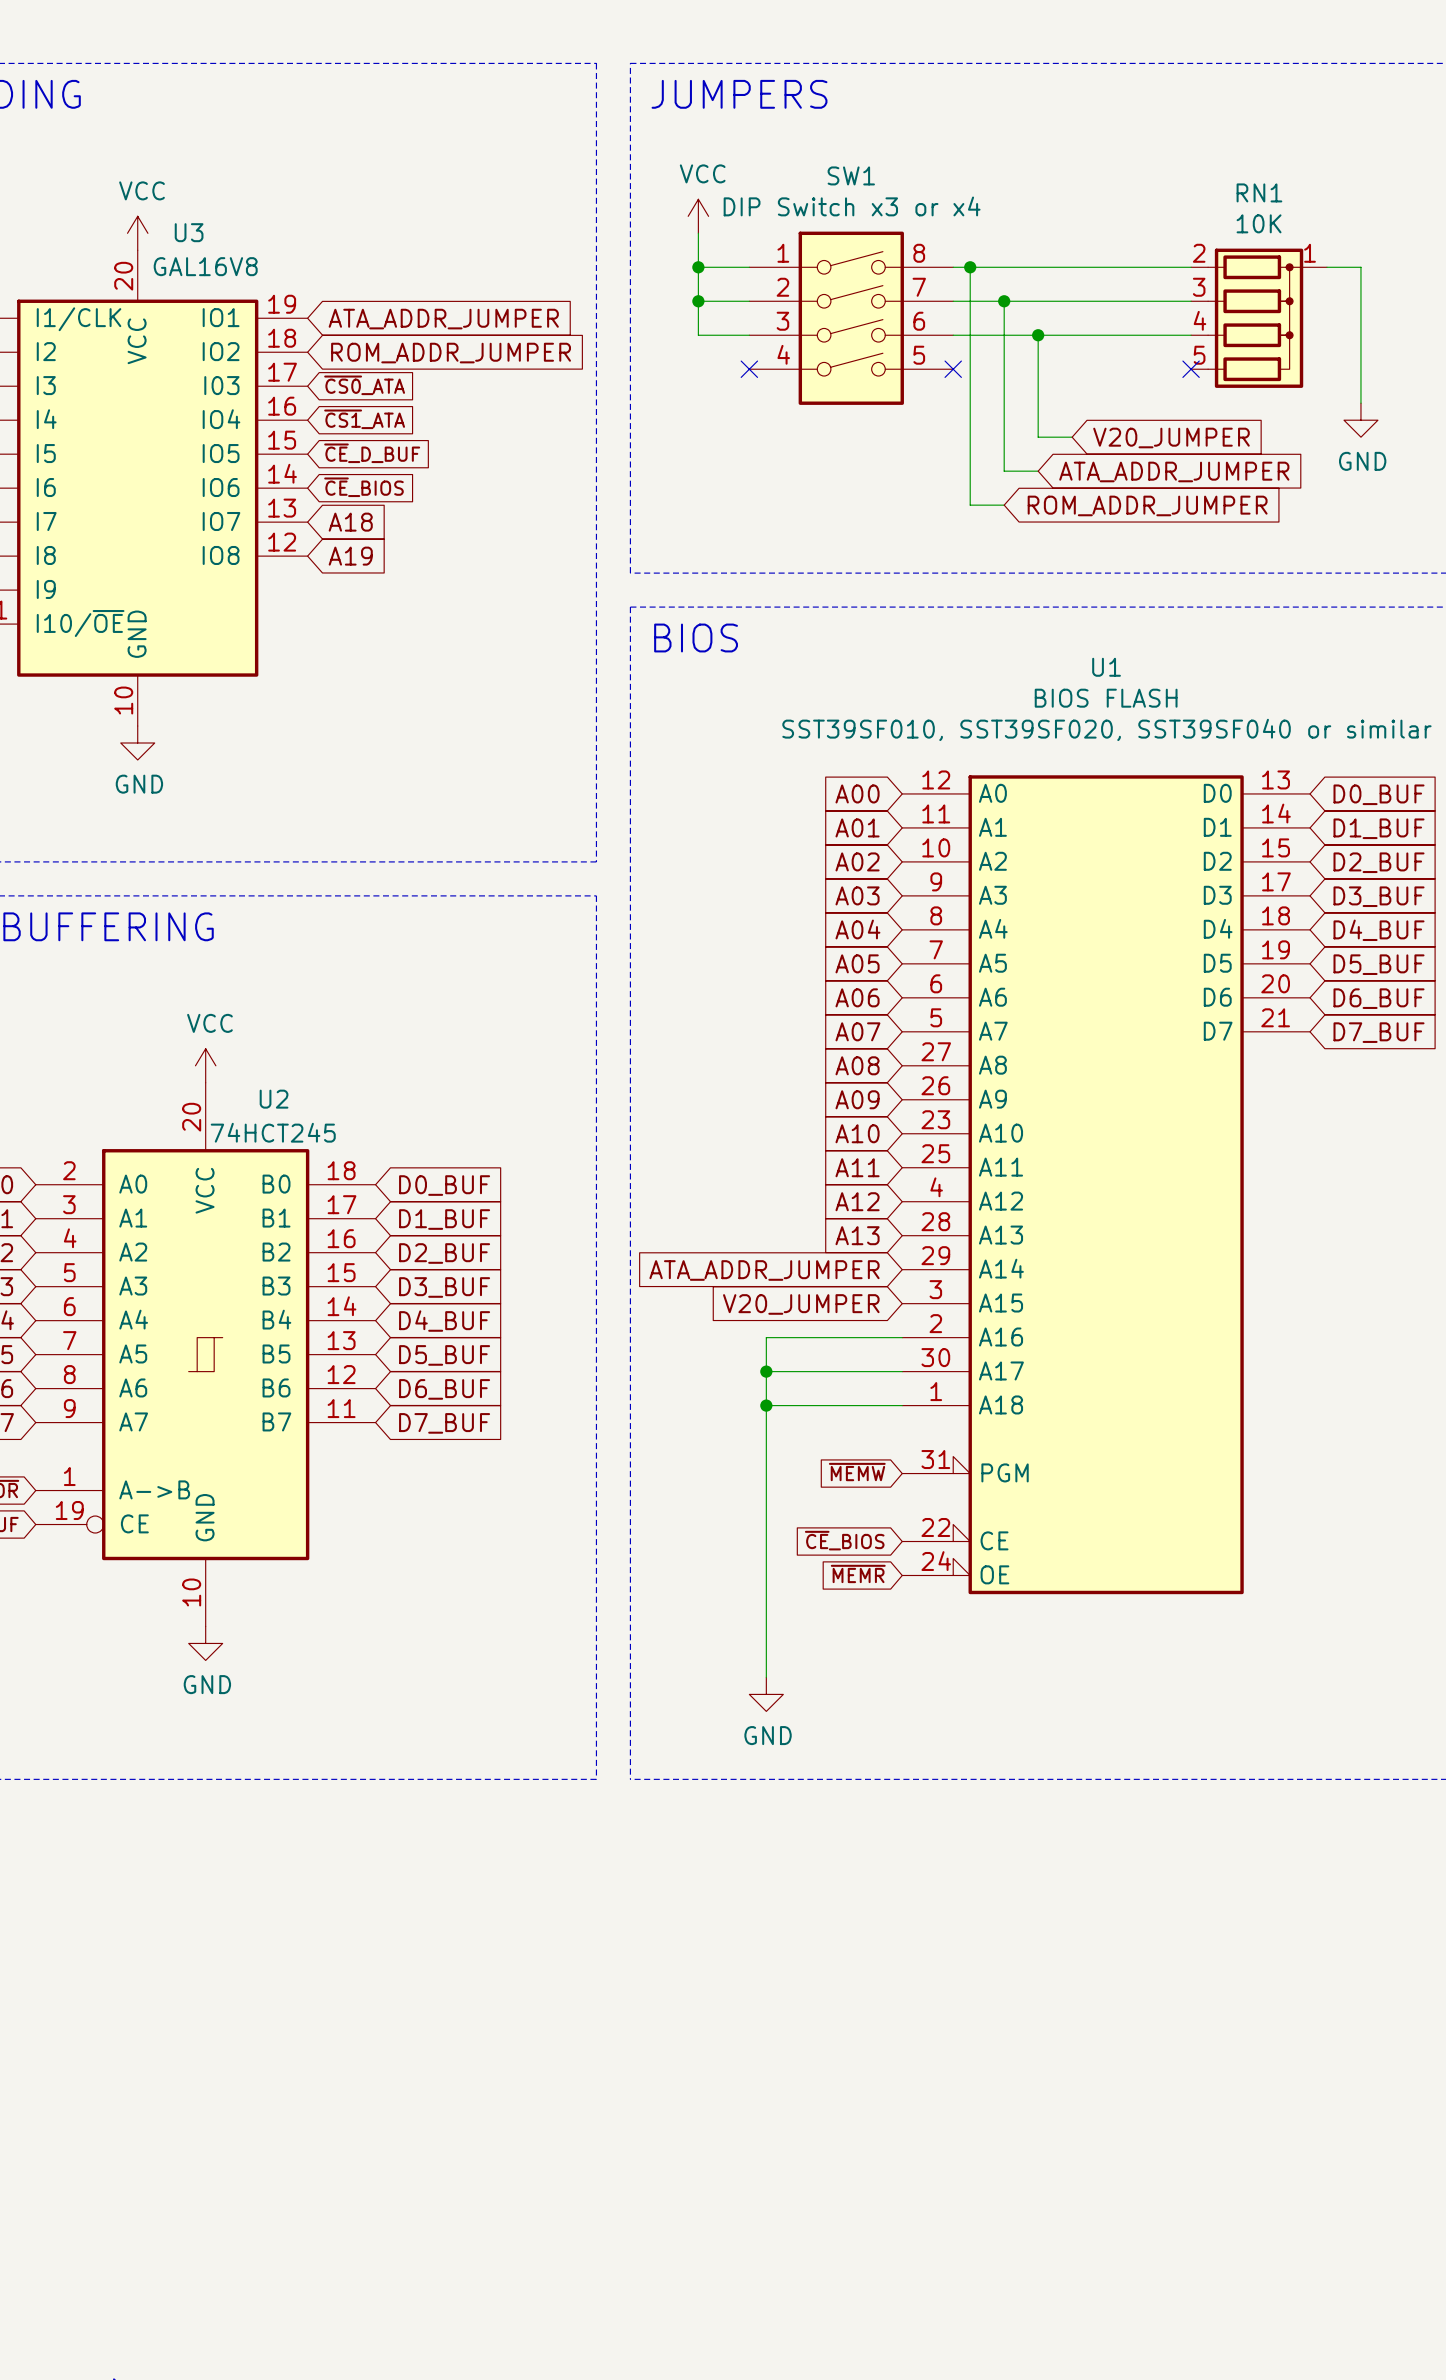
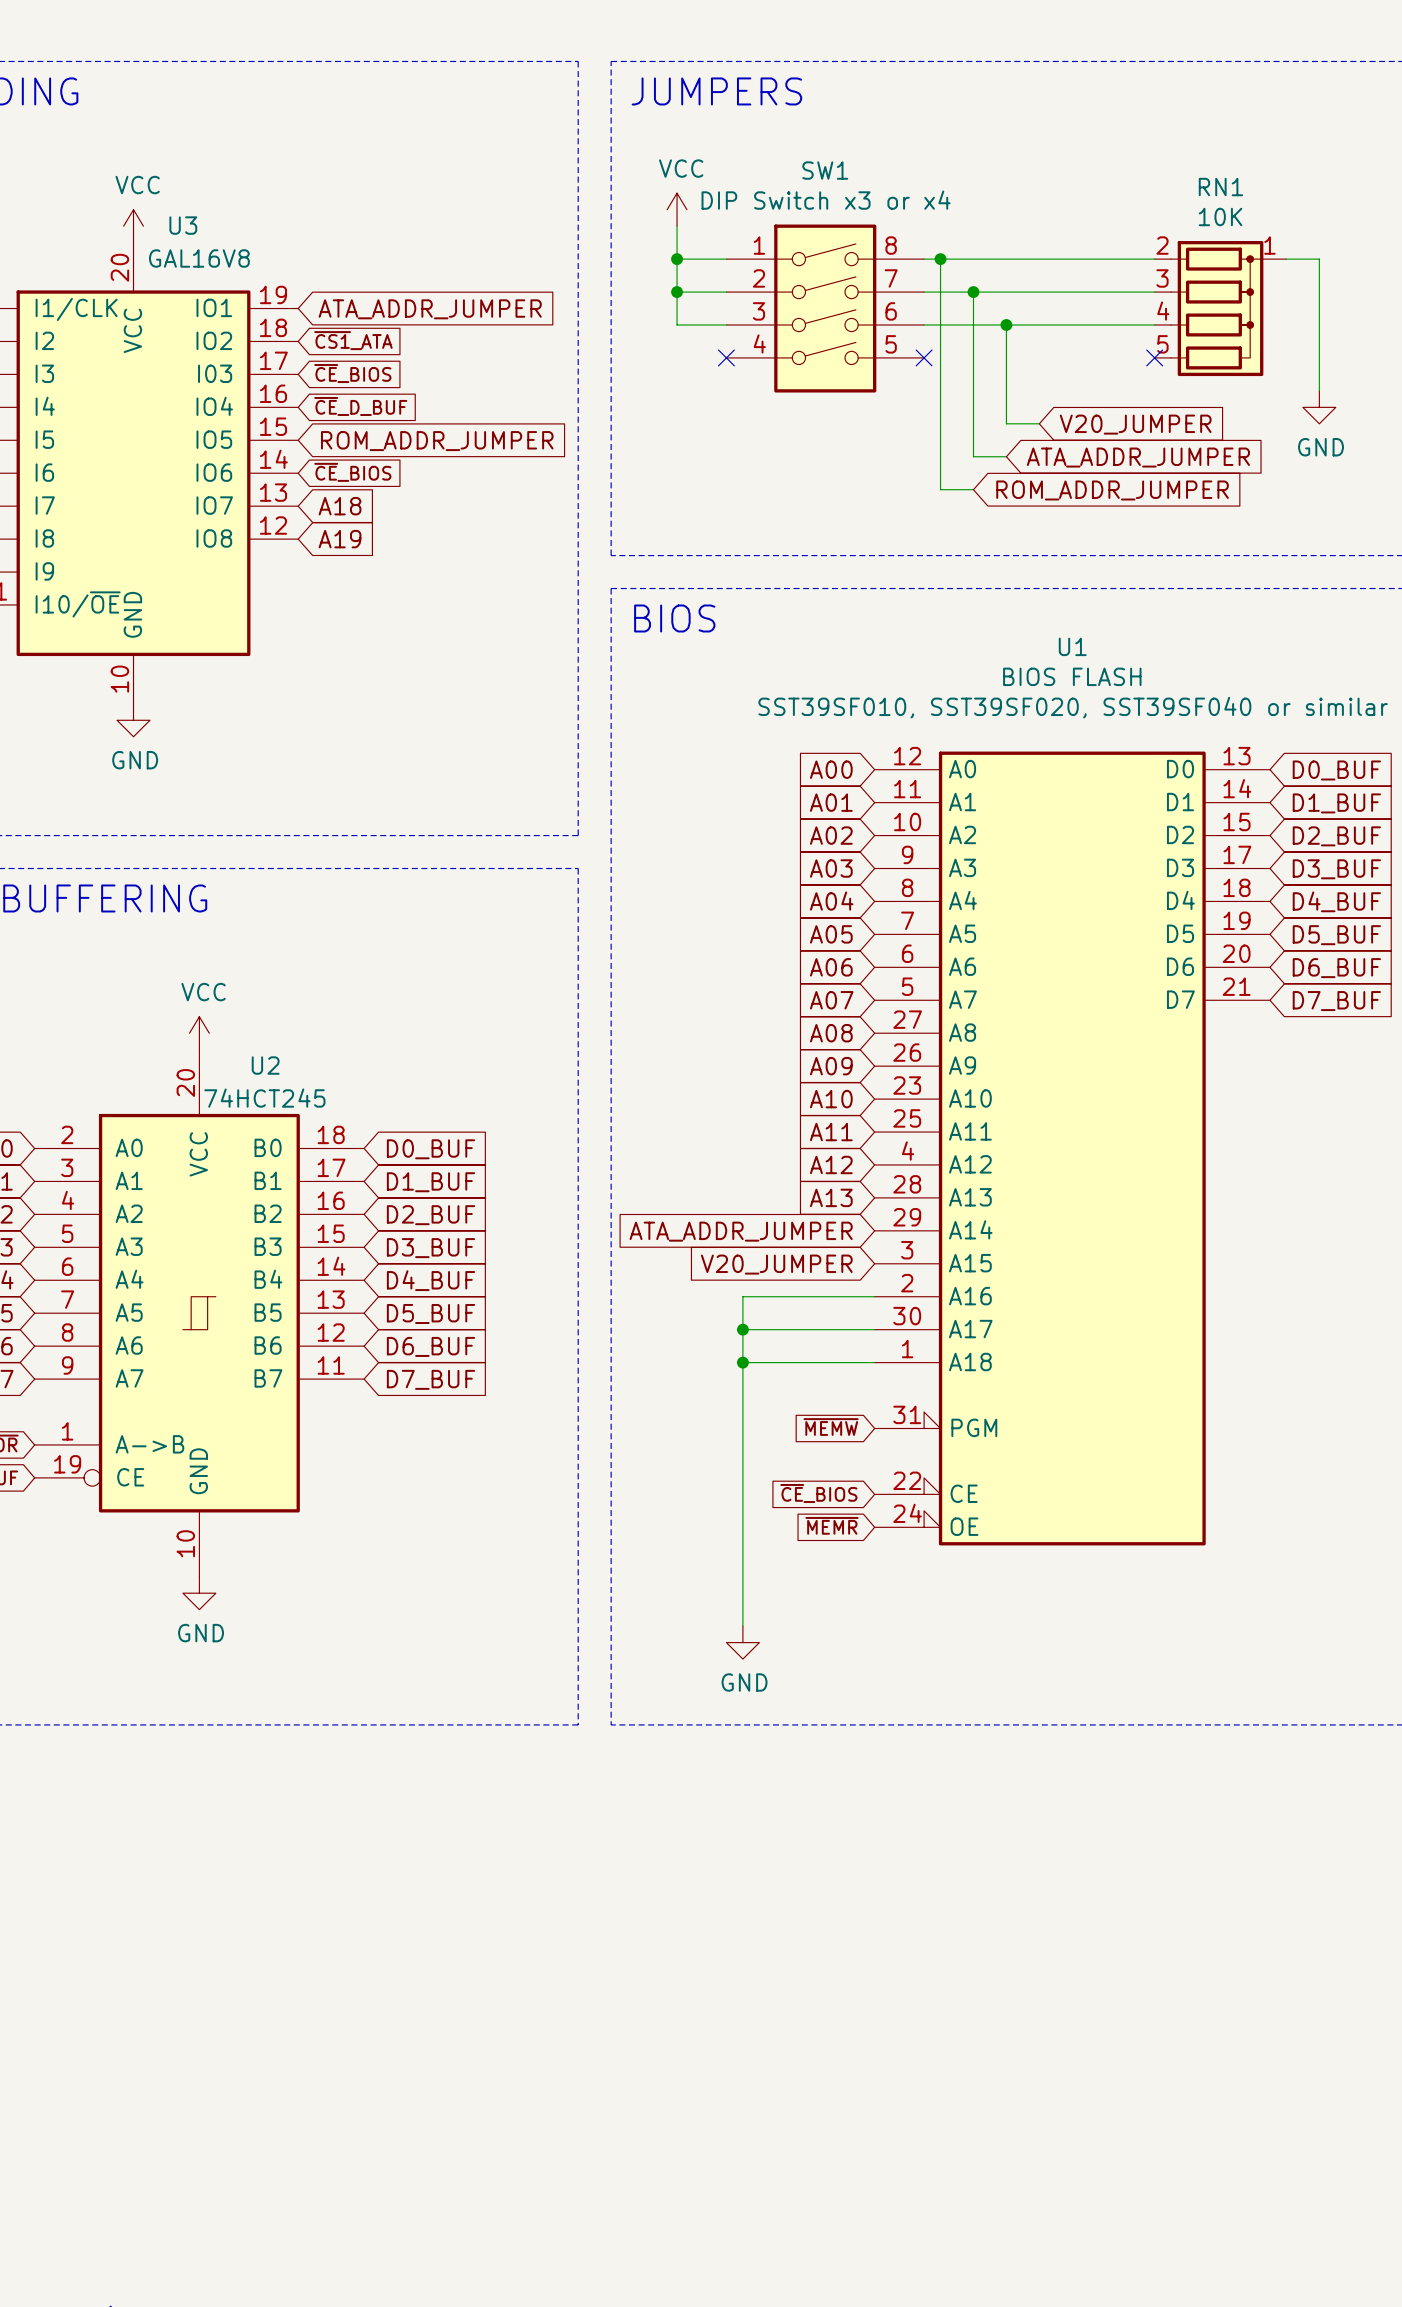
global label: ROM_ADDR_JUMPER (451, 353) -> ~{CS1}_ATA (353, 340)
global label: ~{CS0}_ATA (364, 385) -> ~{CE}_BIOS (352, 373)
global label: ~{CS1}_ATA (364, 419) -> ~{CE}_D_BUF (360, 406)
global label: ~{CE}_D_BUF (372, 453) -> ROM_ADDR_JUMPER (437, 441)

